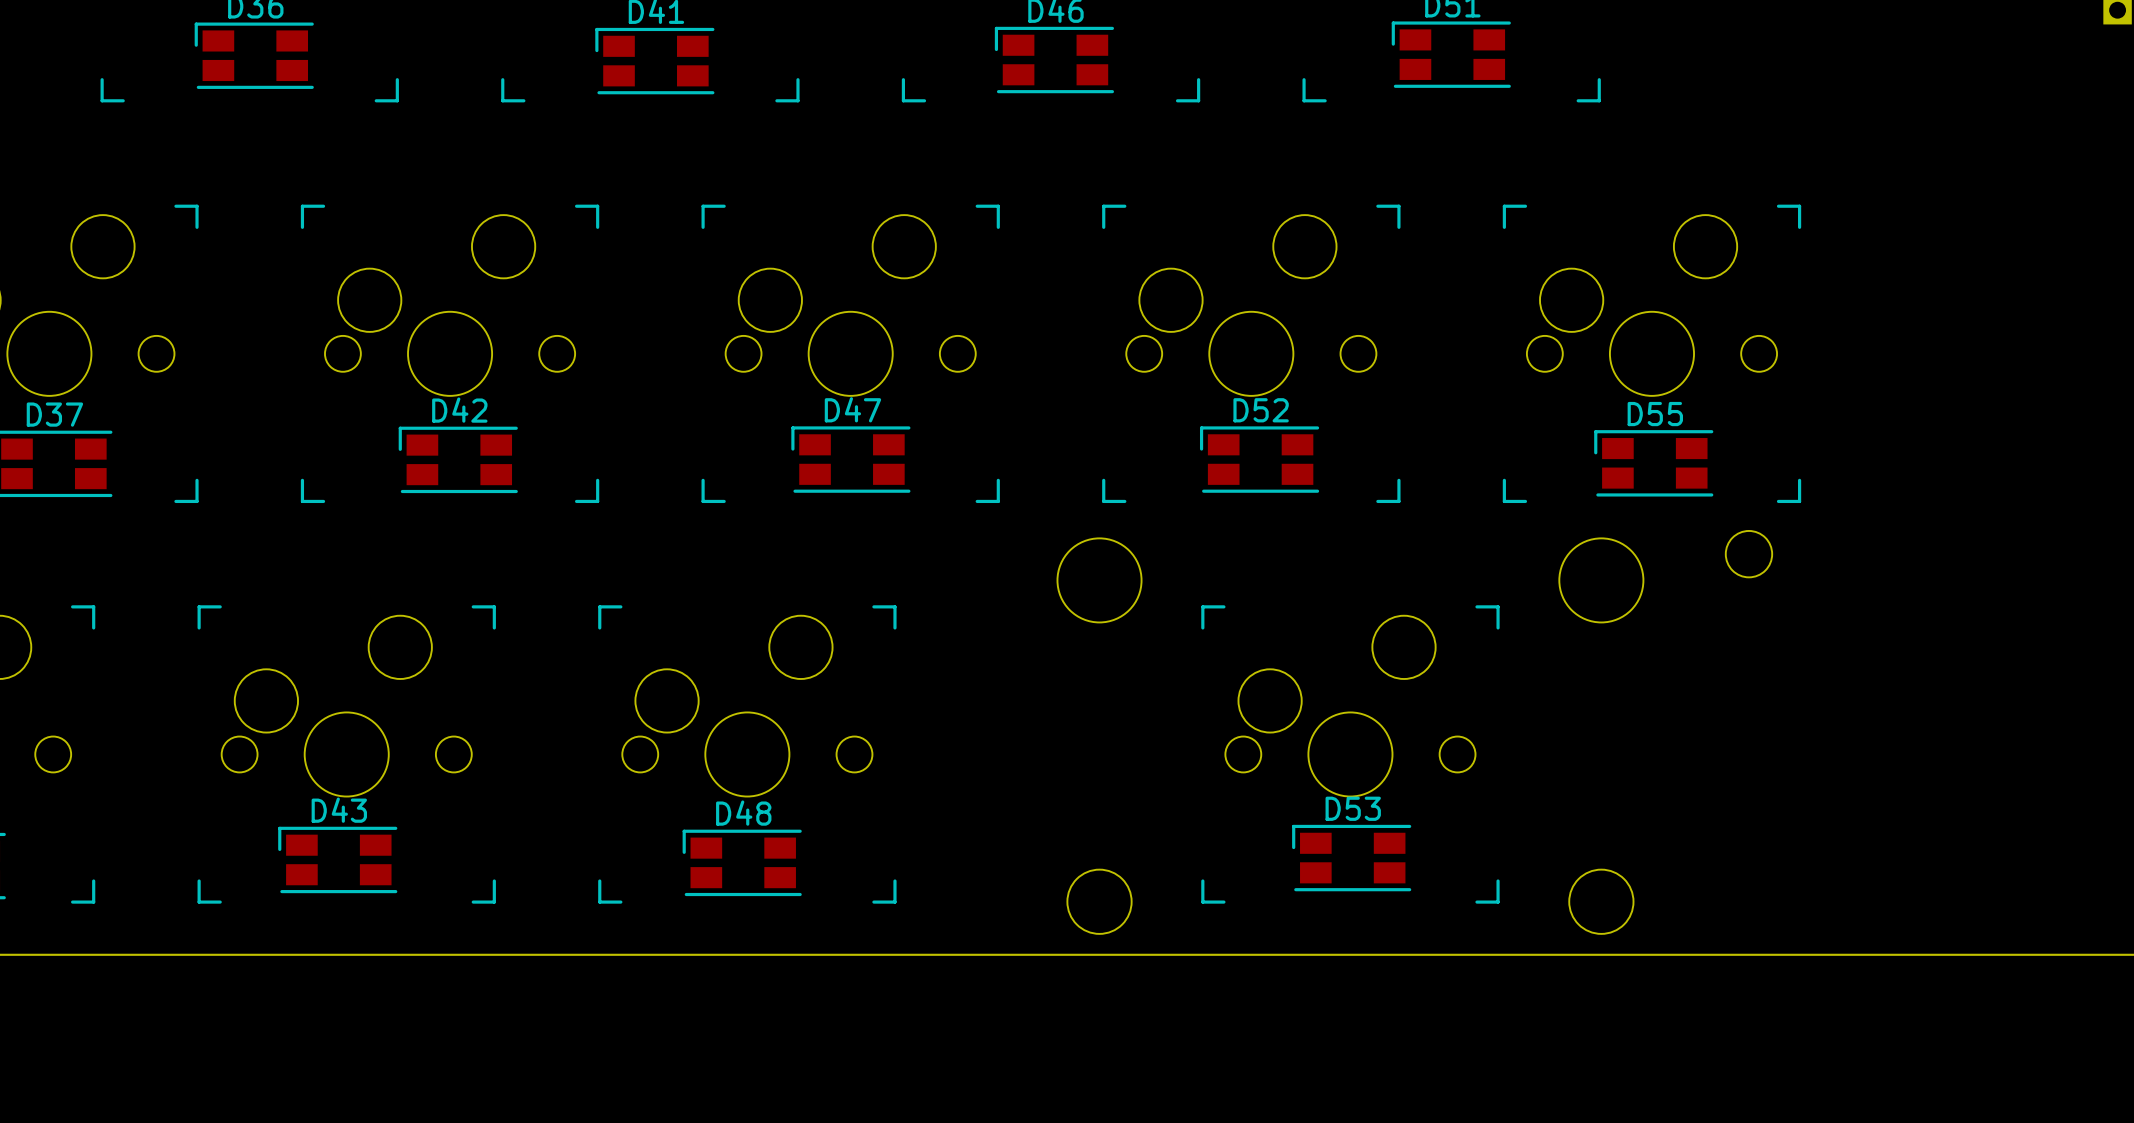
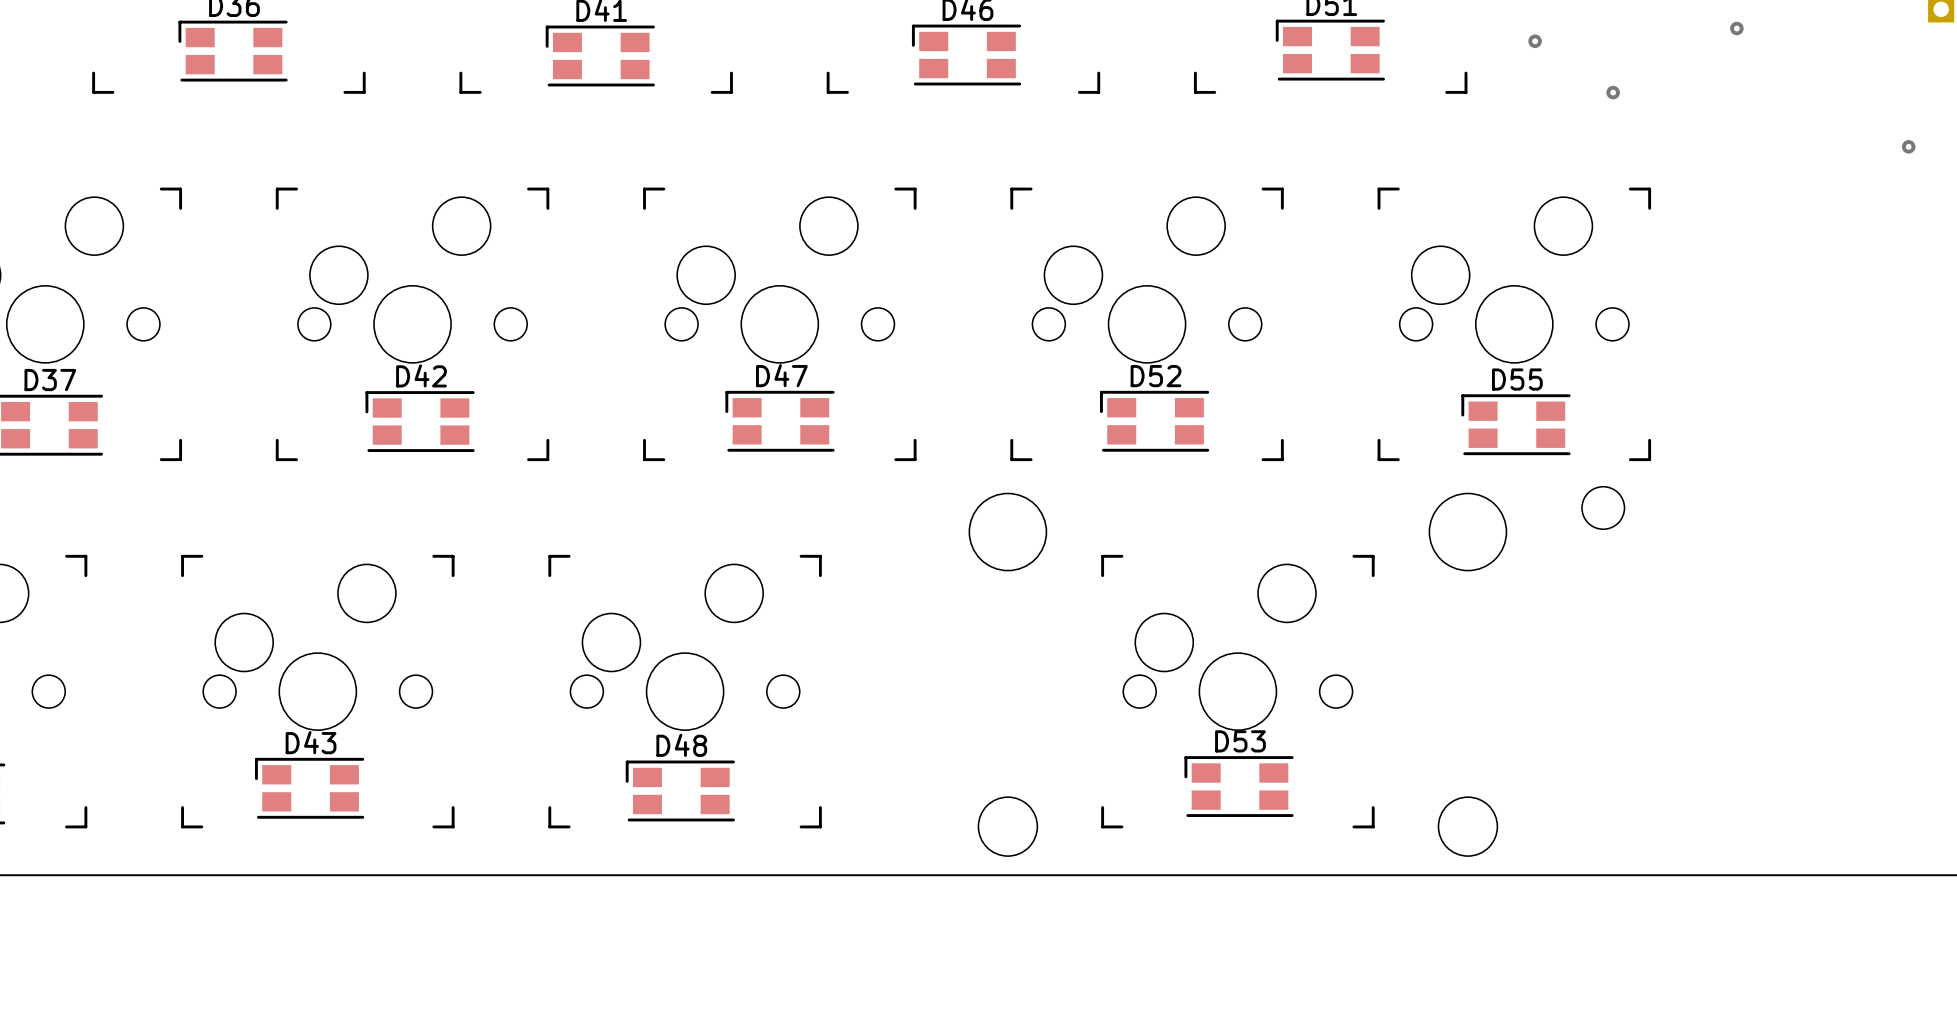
via: none -> (1736, 28)
via: none -> (1535, 41)
via: none -> (1613, 92)
via: none -> (1908, 146)

